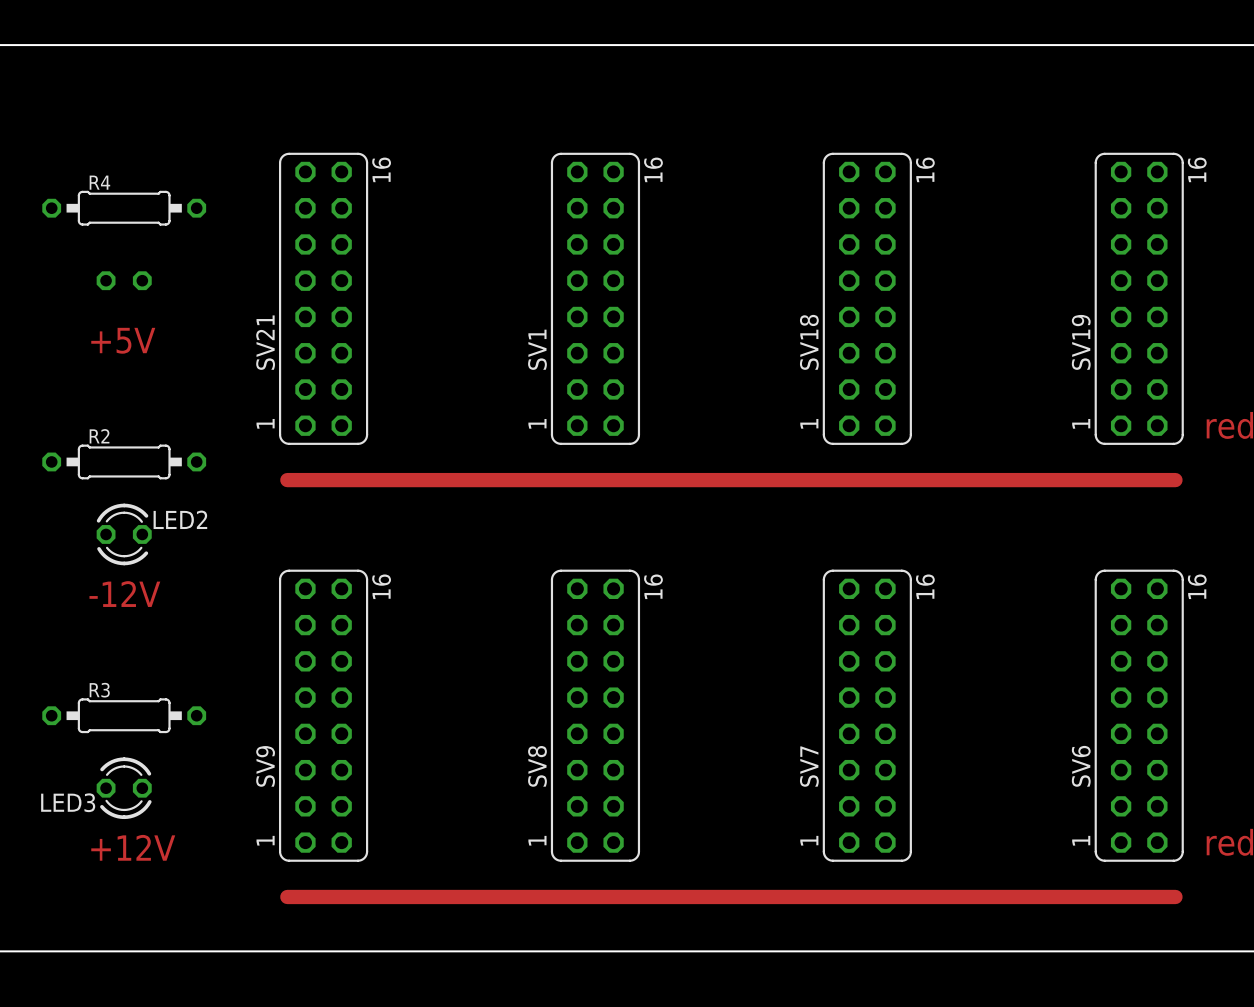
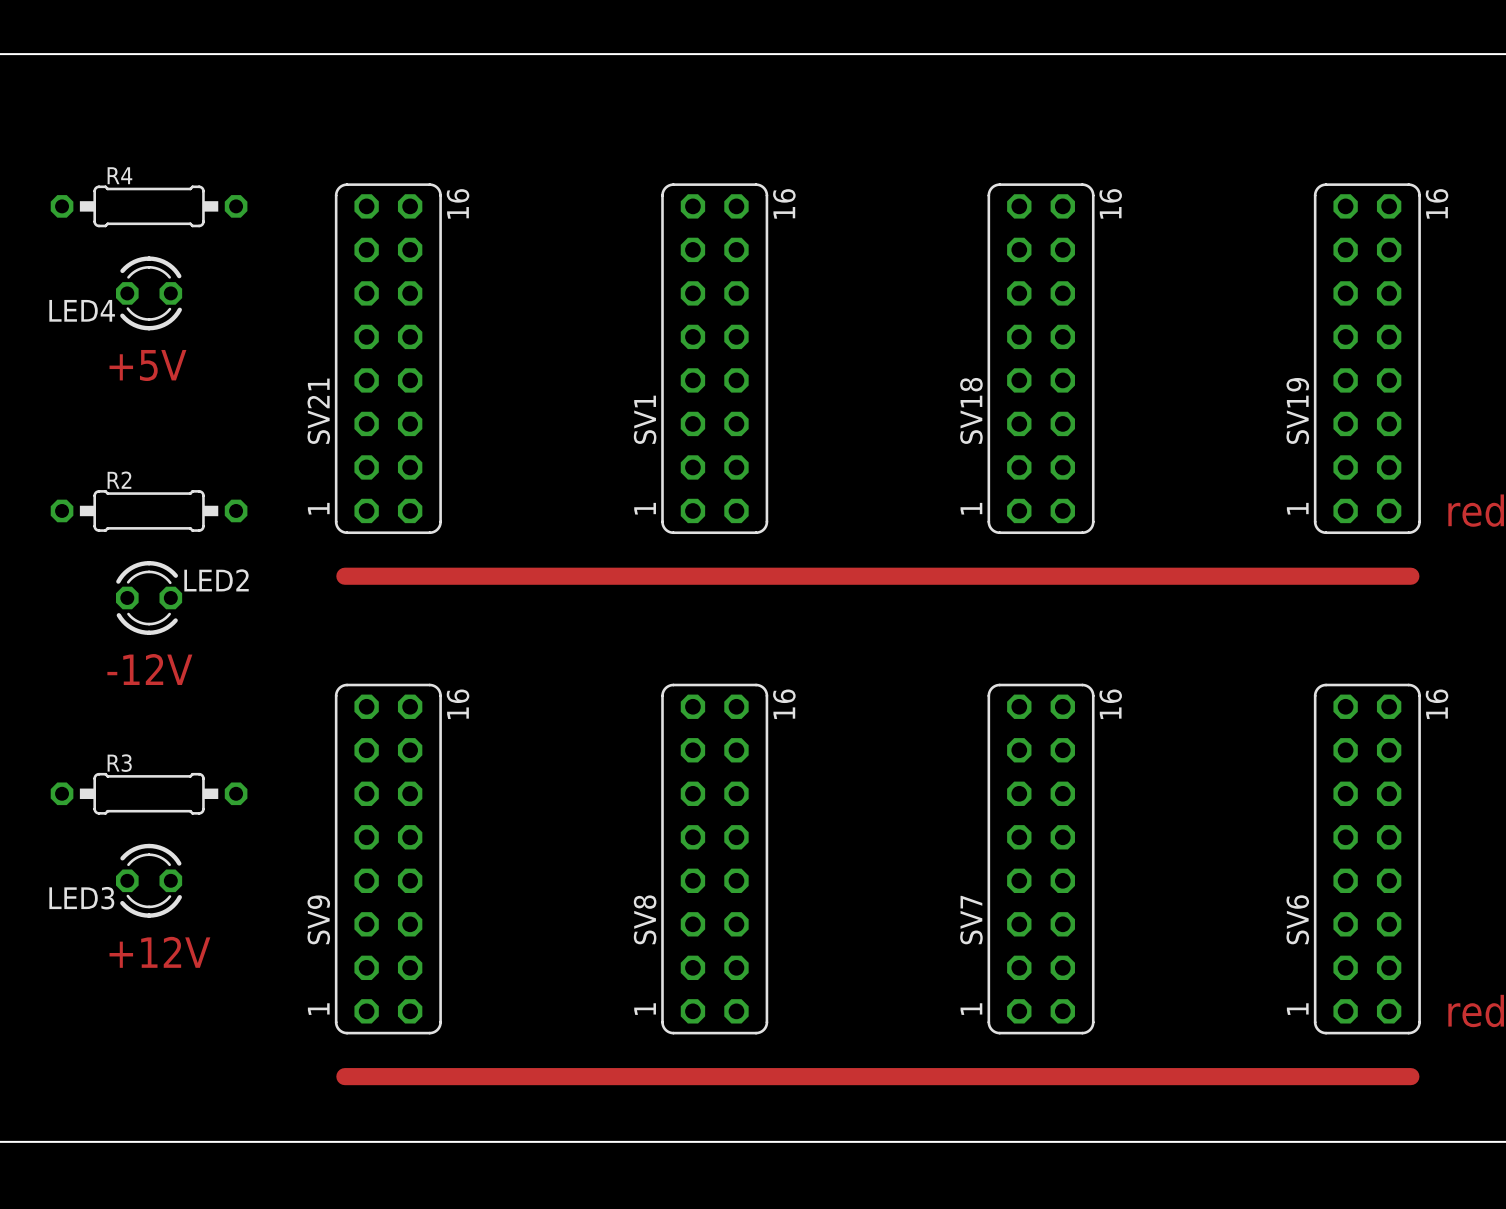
R4 position: (124, 208) -> (149, 206)
LED4 side: bottom (124, 280) -> top (149, 293)
text position: +5V (123, 340) -> +5V (147, 365)
R2 position: (124, 461) -> (149, 510)
LED2 position: (124, 534) -> (149, 597)
text position: -12V (124, 594) -> -12V (149, 669)
R3 position: (124, 715) -> (149, 793)
LED3 position: (124, 788) -> (149, 880)
text position: +12V (133, 847) -> +12V (159, 952)

